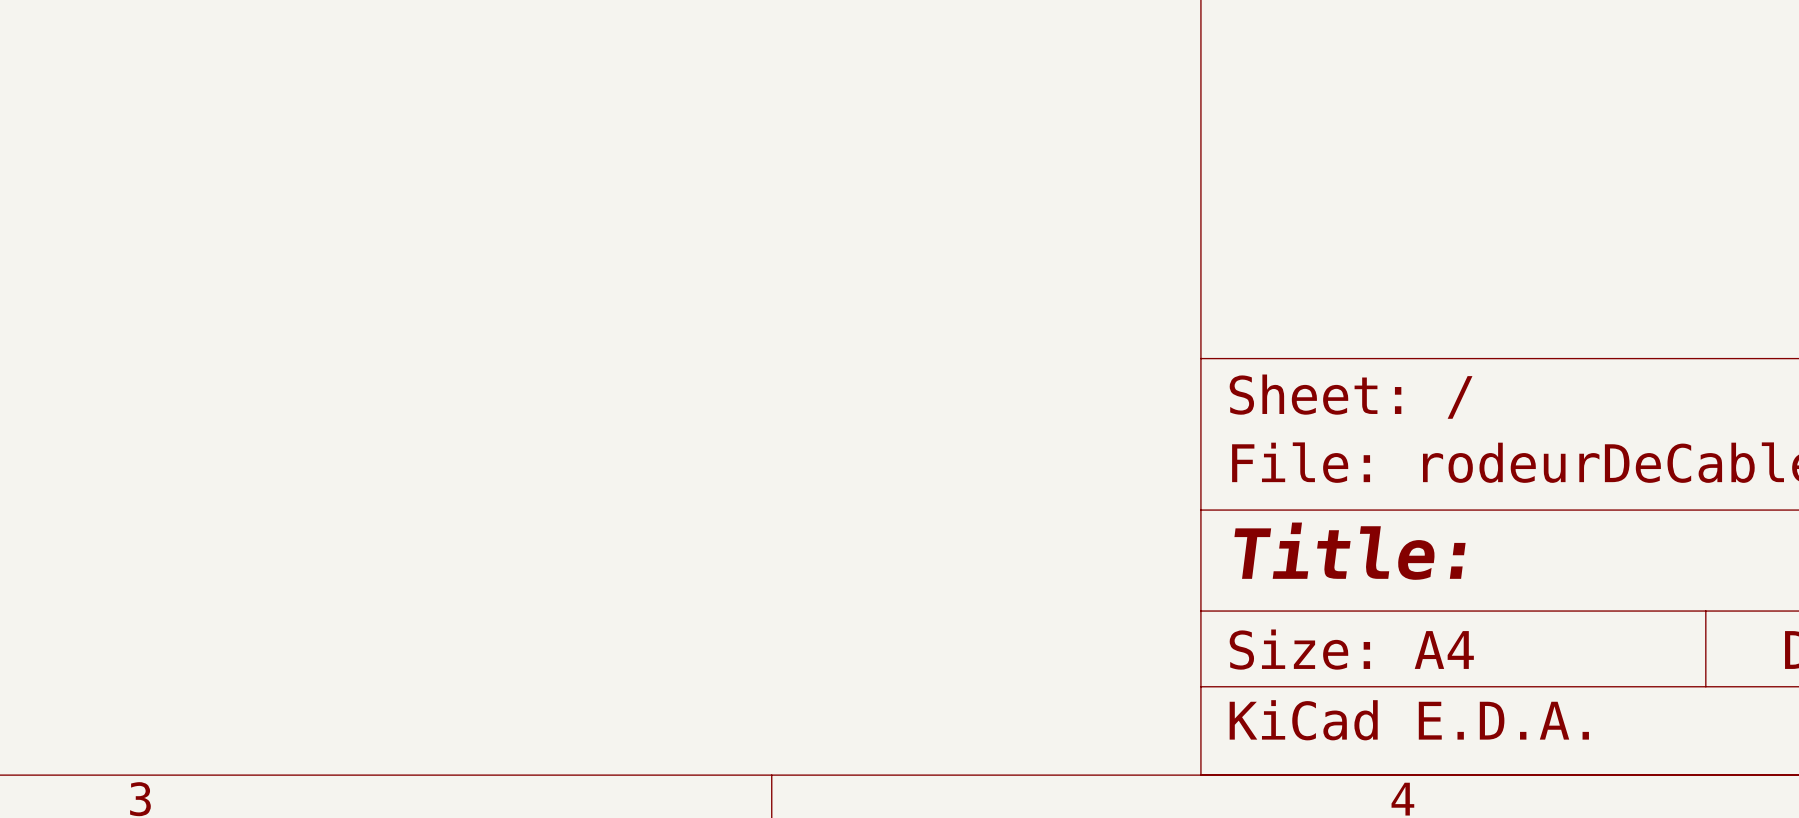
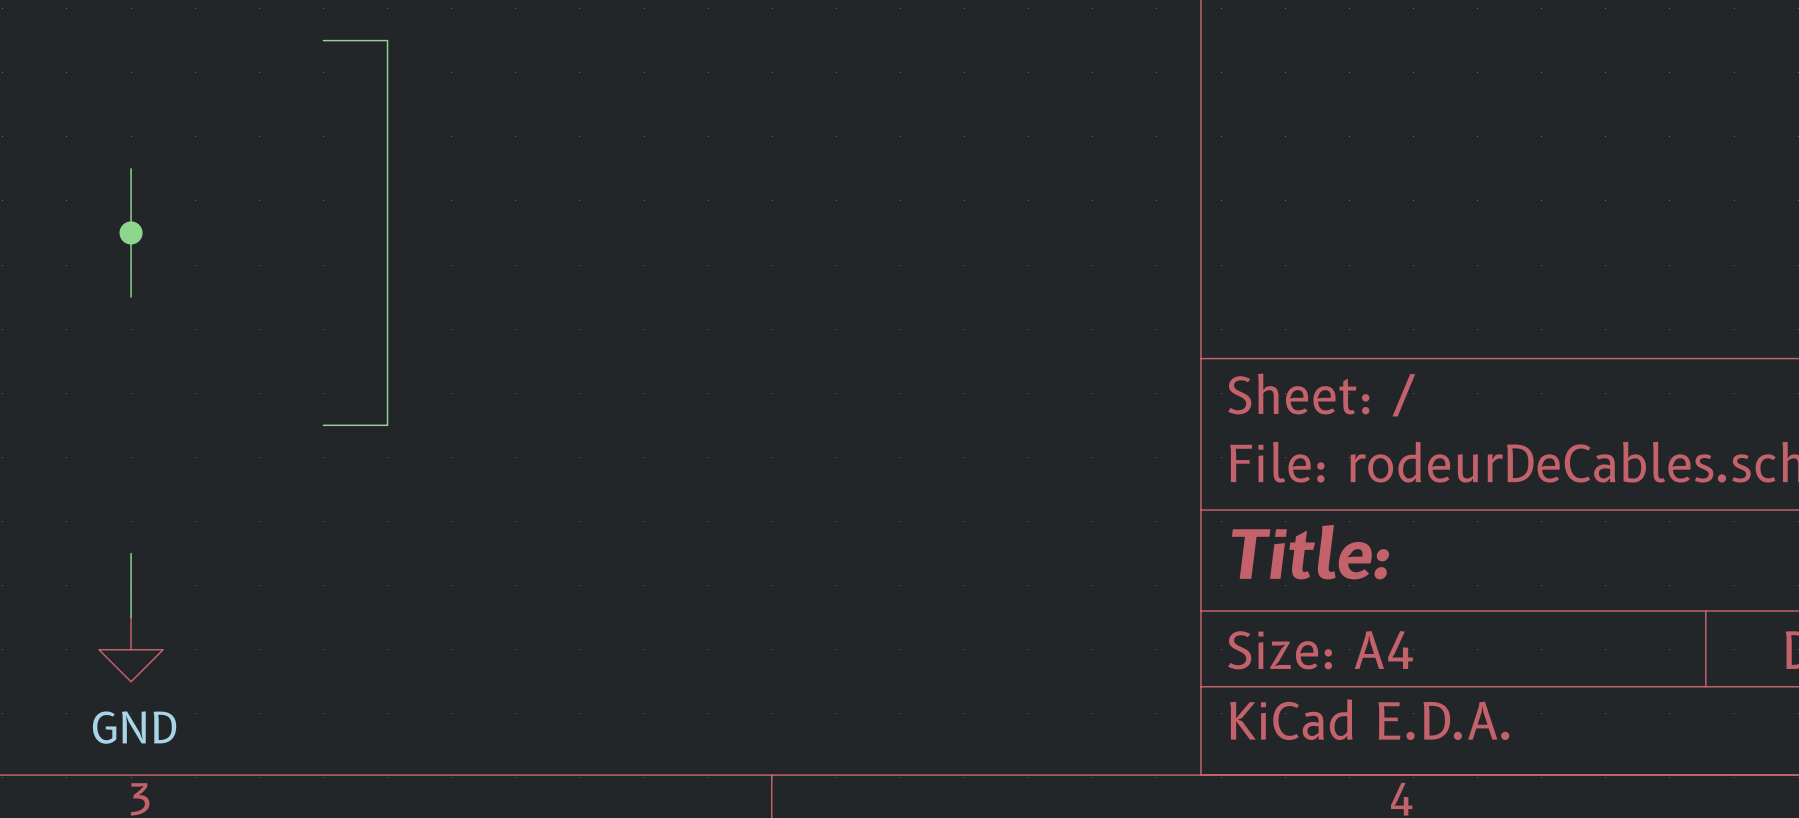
wire: none -> (323, 40) (387, 40) (387, 425) (323, 425)
wire: none -> (131, 168) (131, 297)
junction: none -> (131, 232)
wire: none -> (131, 553) (131, 617)
power symbol: none -> GND (131, 649)

